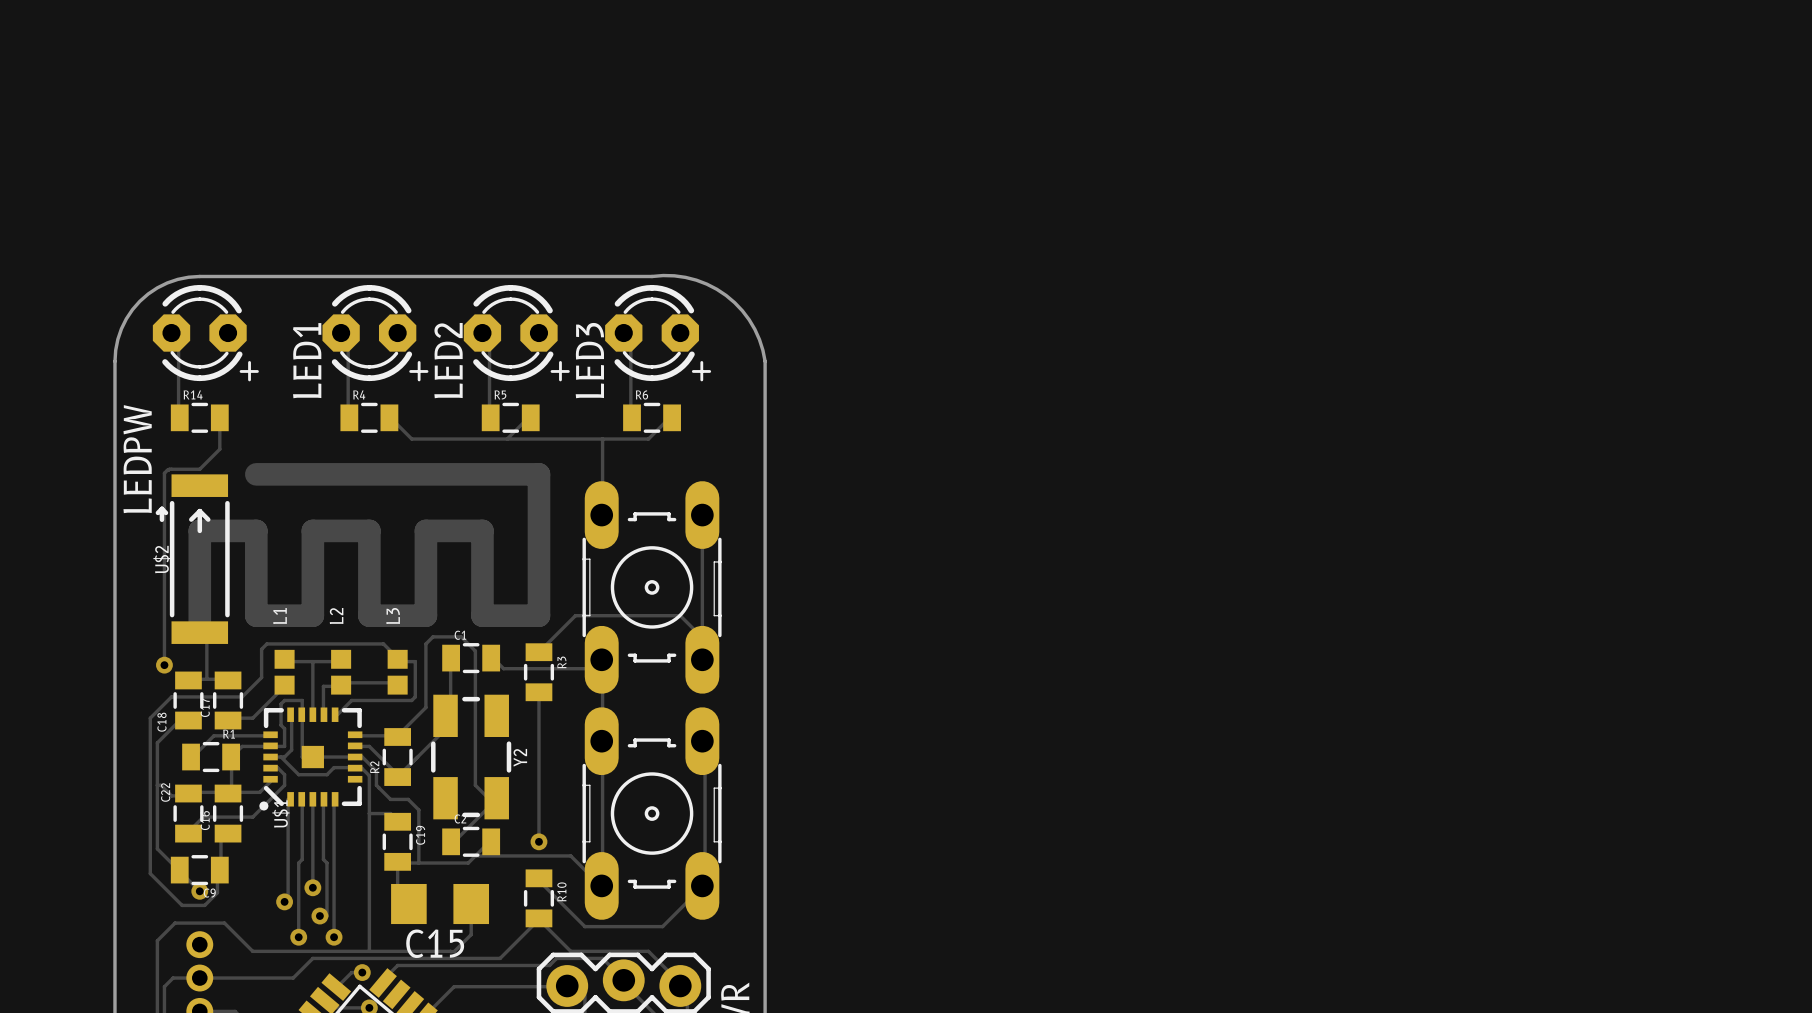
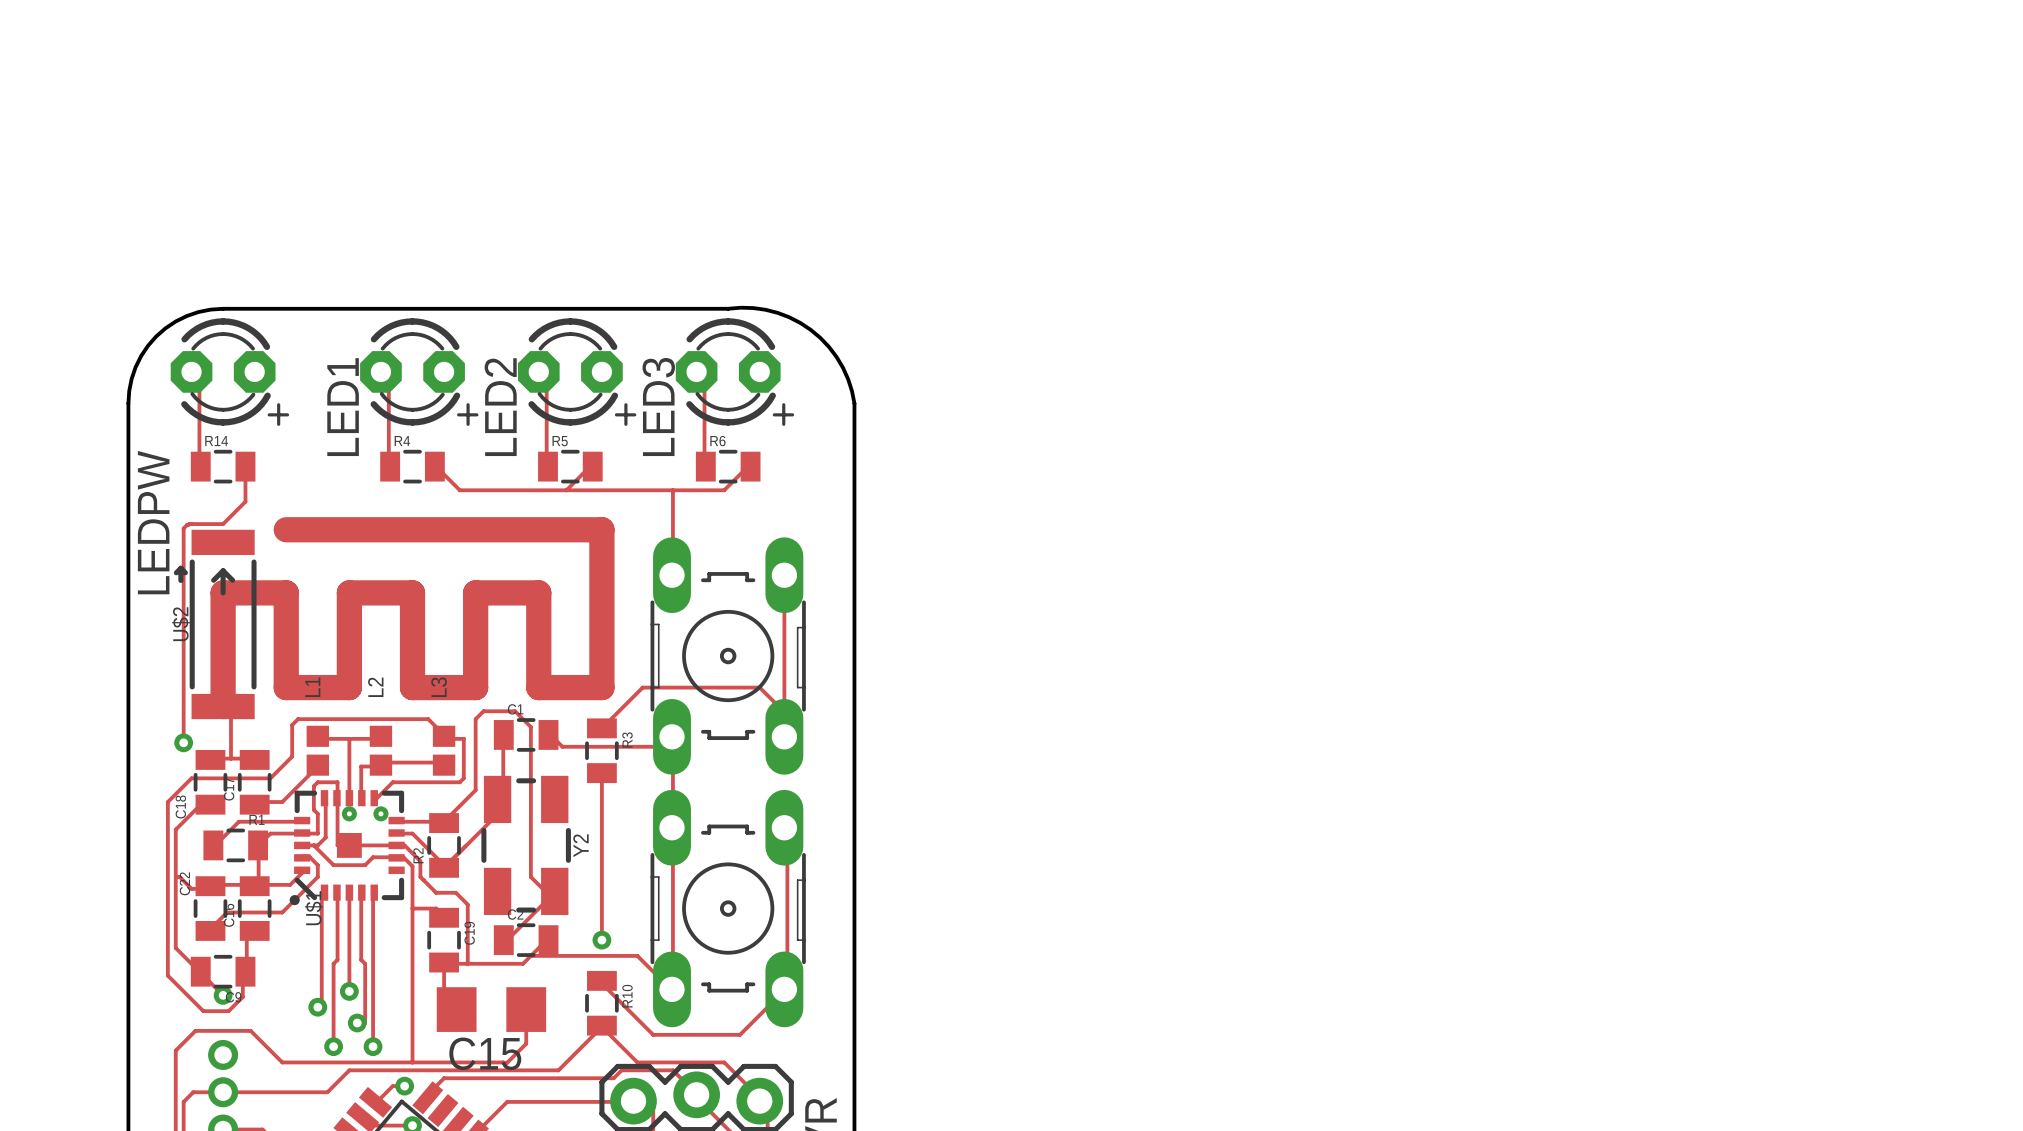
via: none -> (349, 813)
via: none -> (380, 813)

